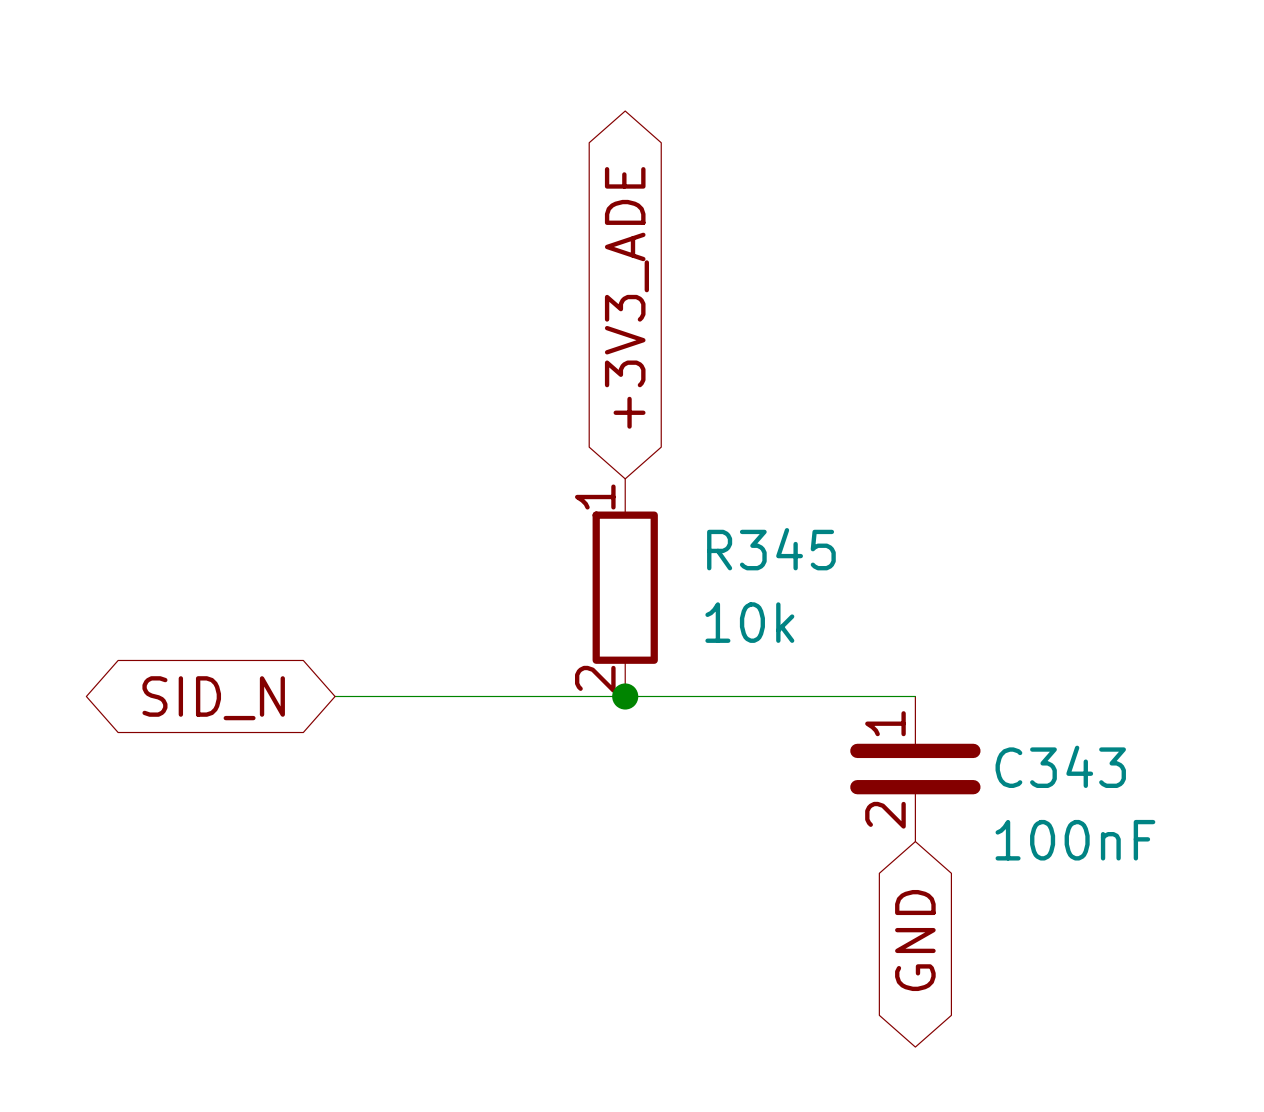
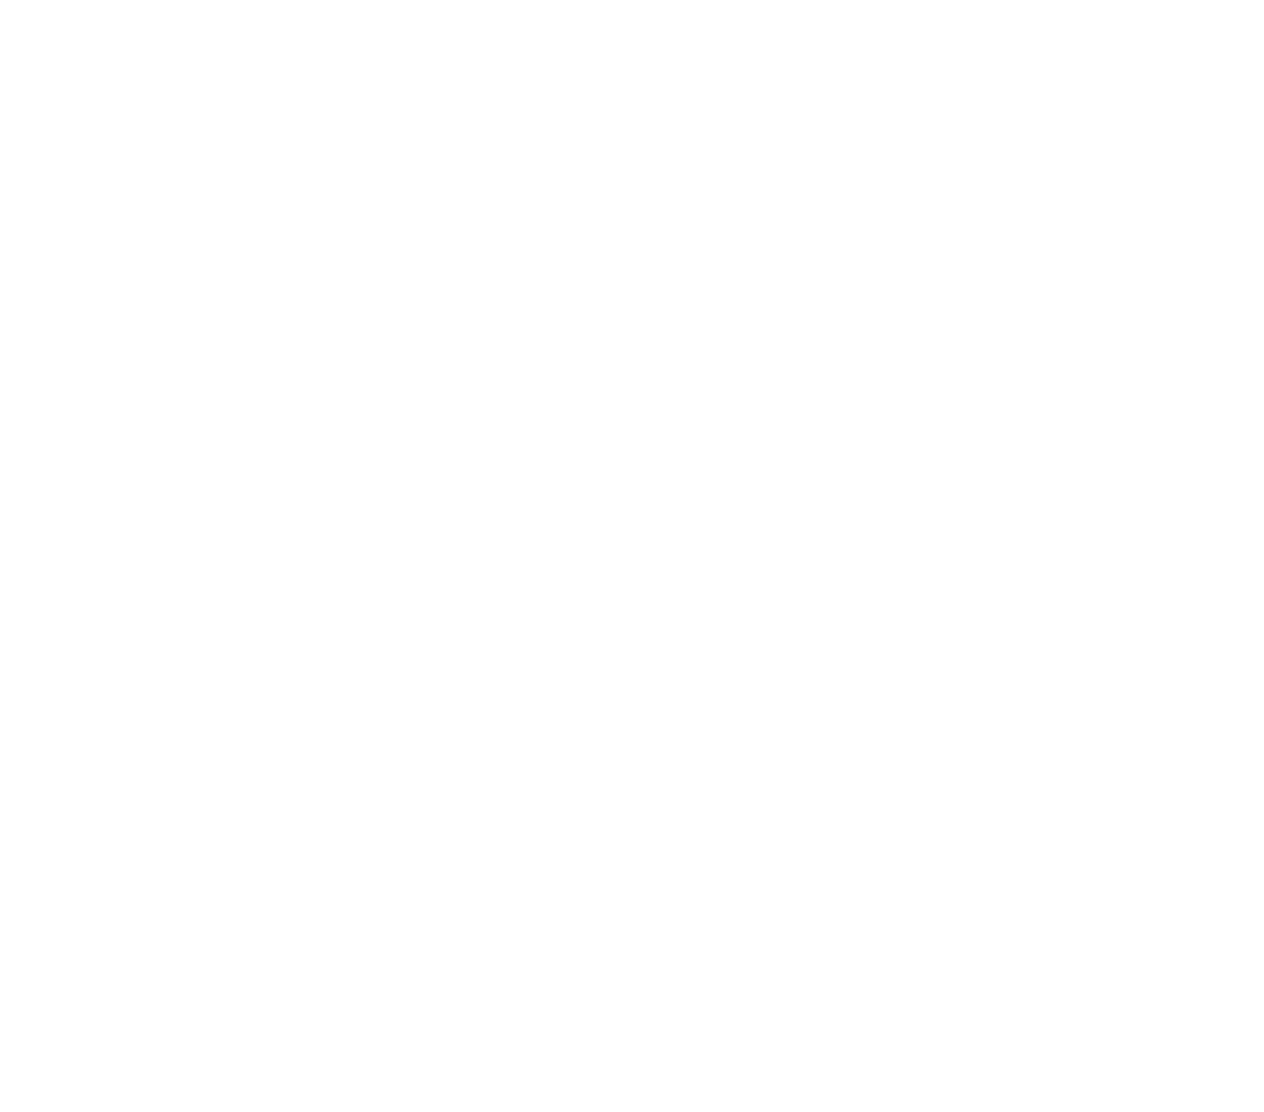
global label: +3V3_ADE (626, 297) -> none
R345: 10k (625, 587) -> none
wire: (335, 696) (915, 696) -> none
junction: (625, 696) -> none
global label: SID_N (213, 698) -> none
C343: 100nF (915, 769) -> none
global label: GND (915, 940) -> none

